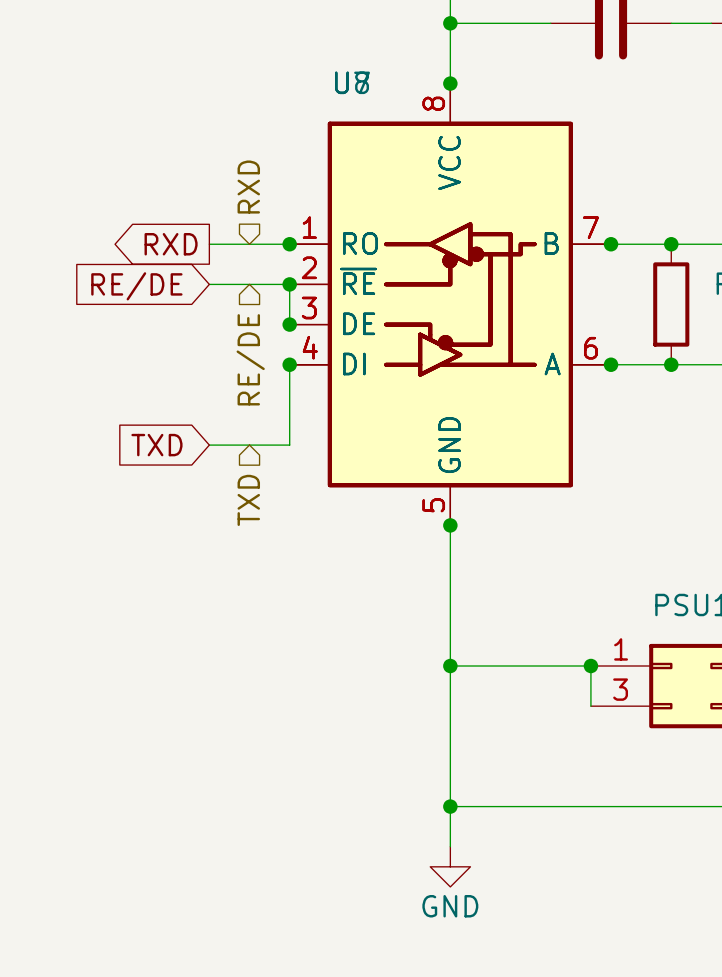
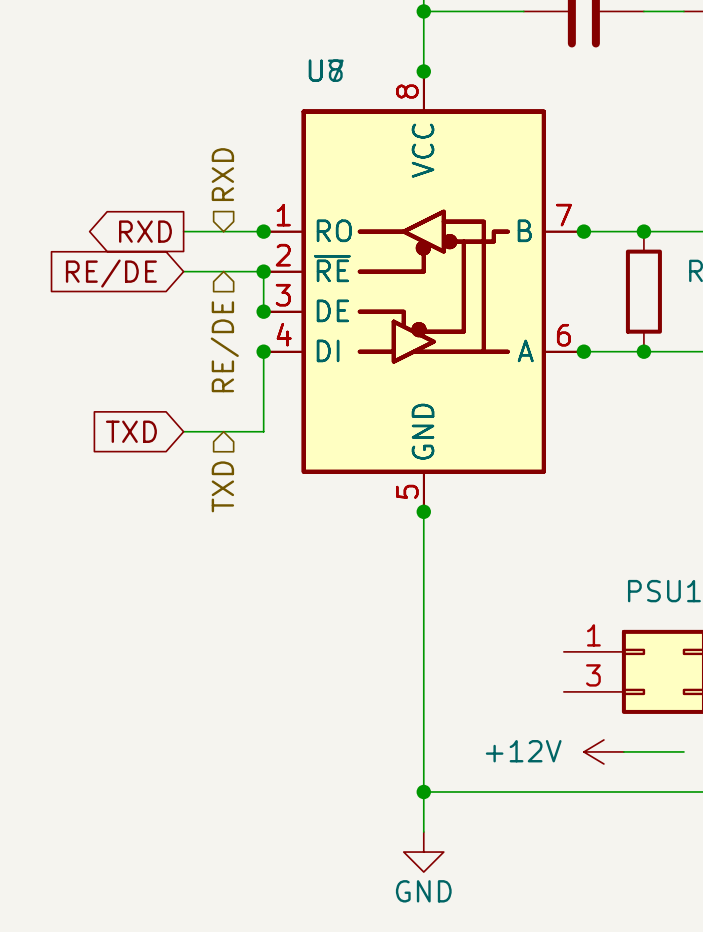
wire: (450, 666) (590, 666) (590, 706) -> none
junction: (450, 666) -> none
junction: (590, 666) -> none
power symbol: none -> +12V (603, 751)
wire: none -> (623, 751) (683, 751)

